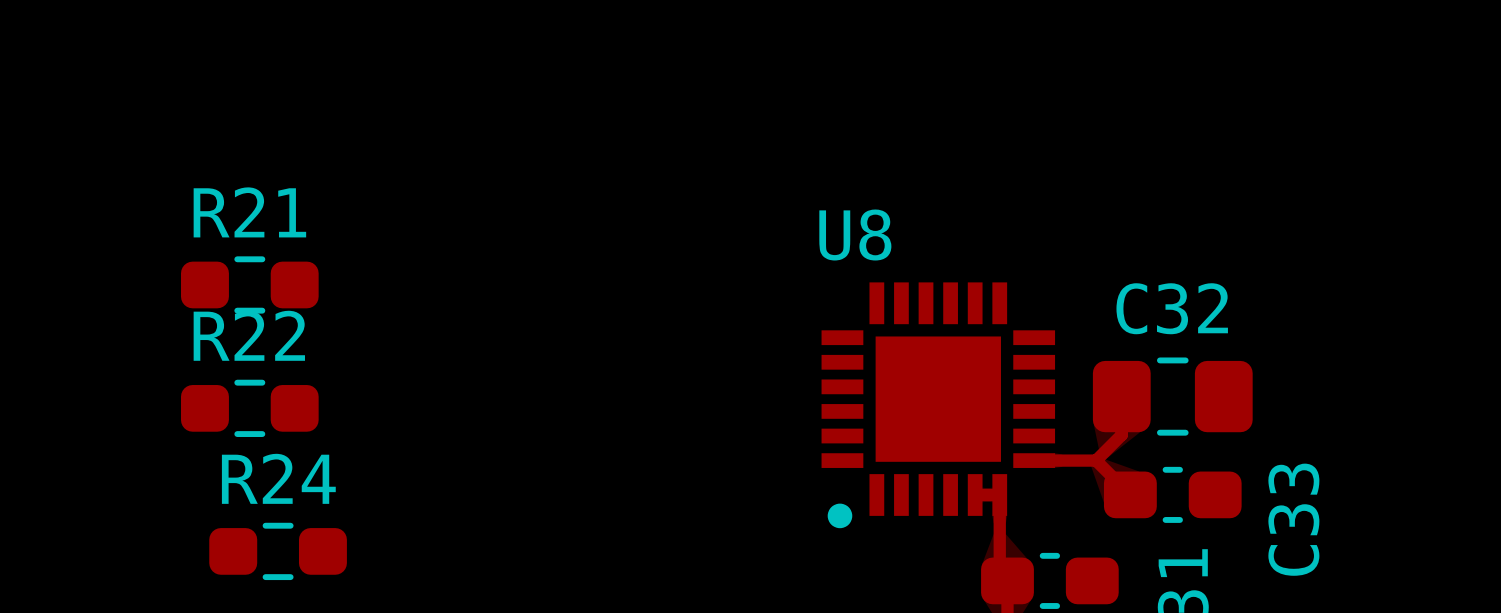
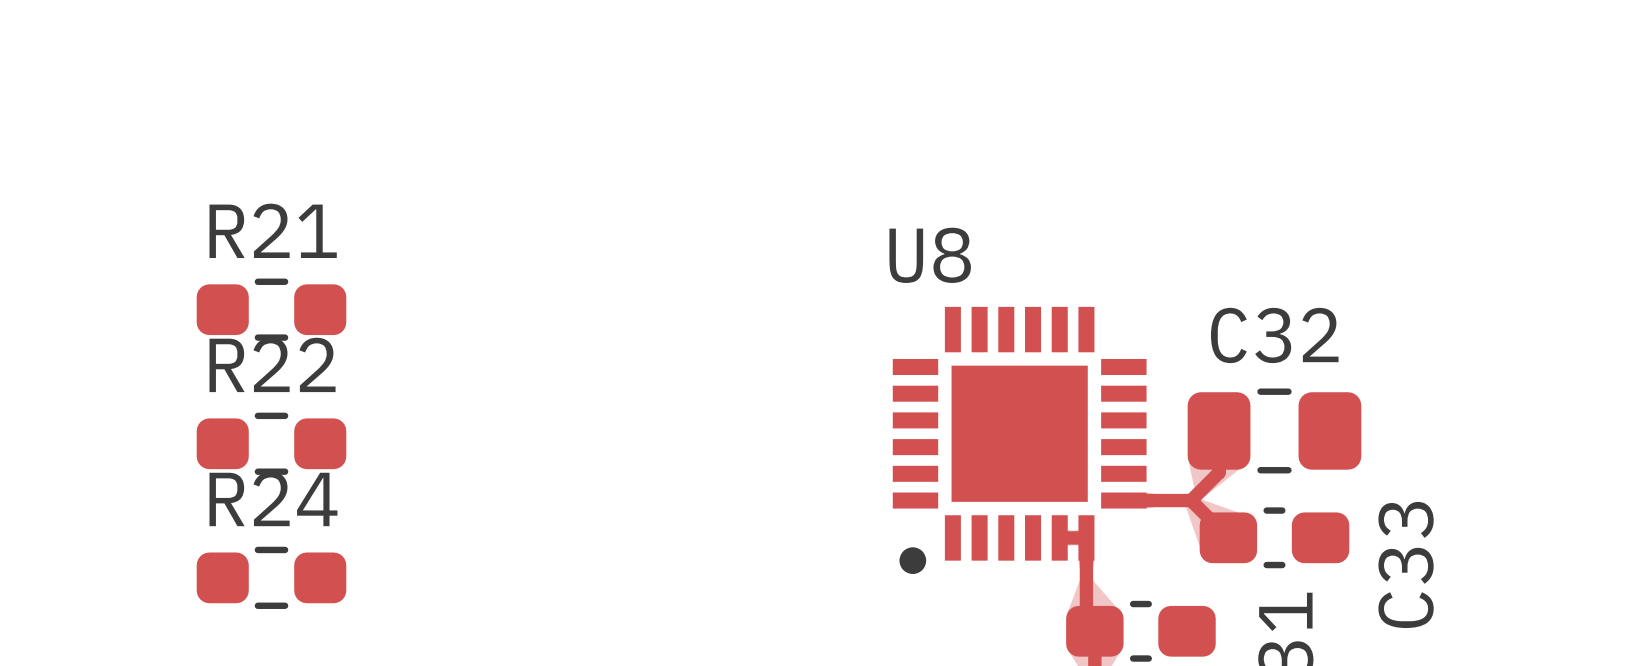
R24 position: (278, 551) -> (271, 577)

